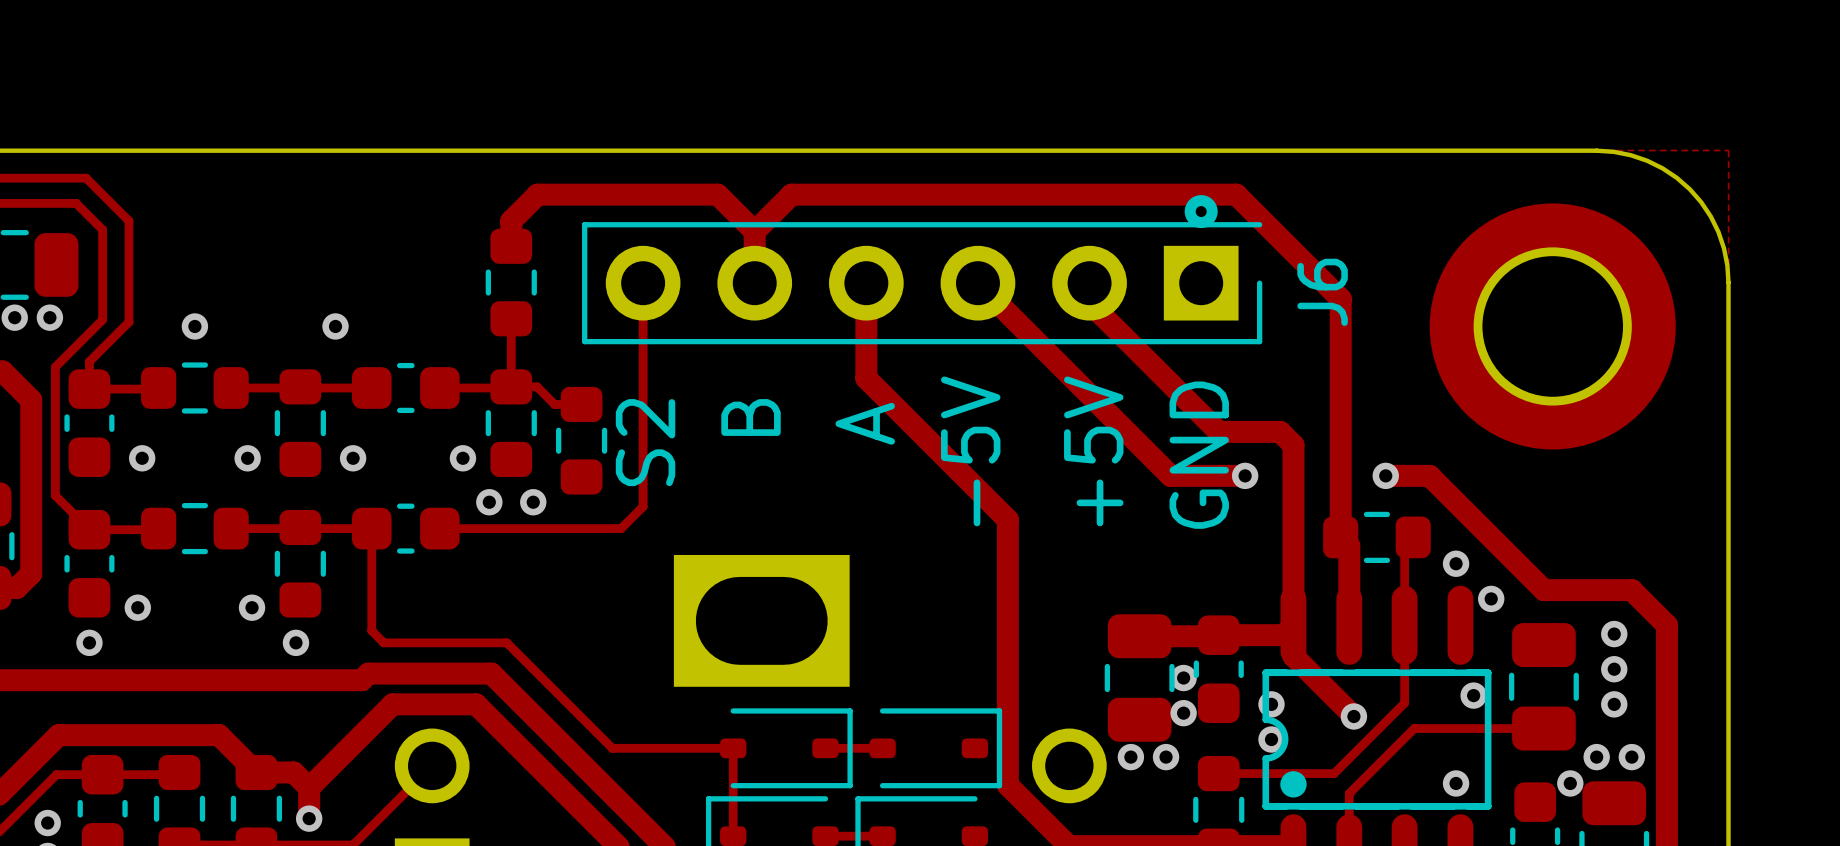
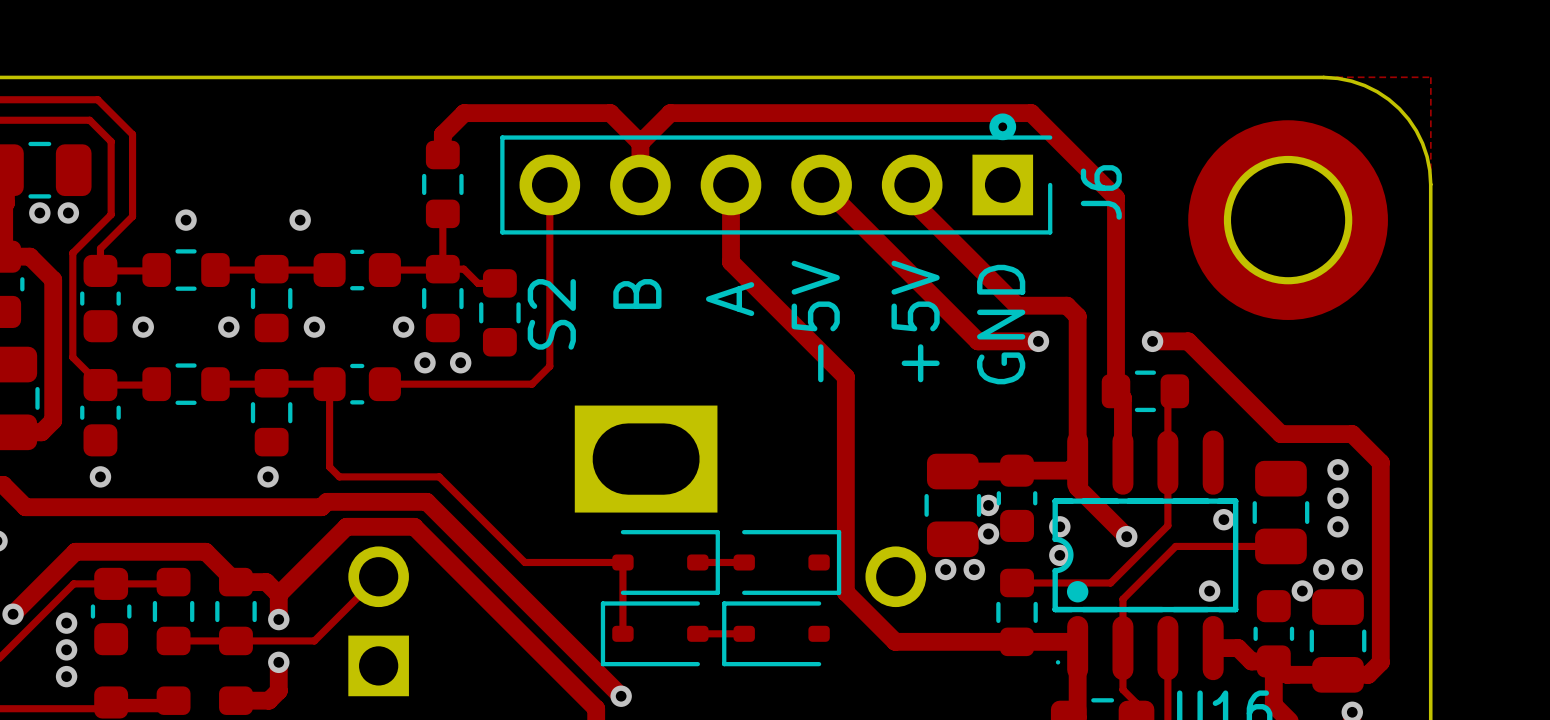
via: (1456, 563) -> none
via: (1491, 598) -> none
via: (137, 607) -> none
via: (252, 607) -> none

